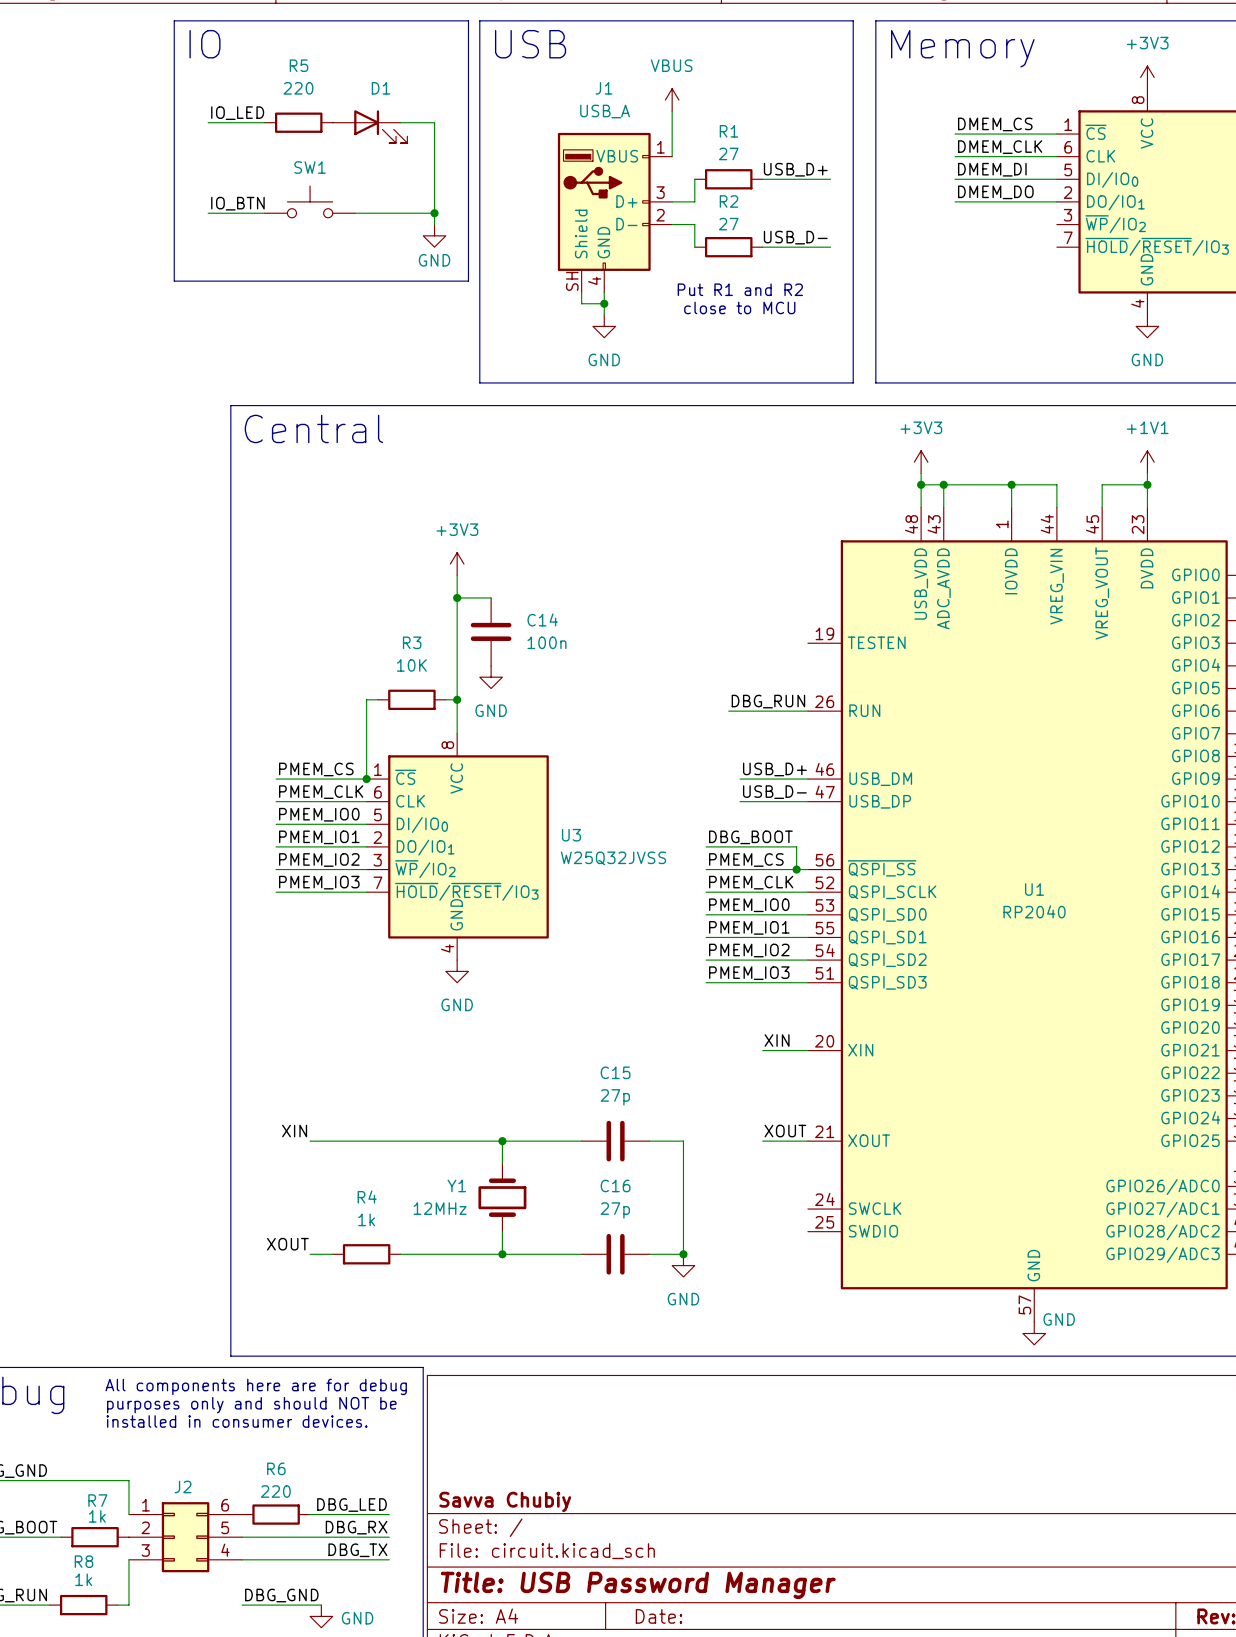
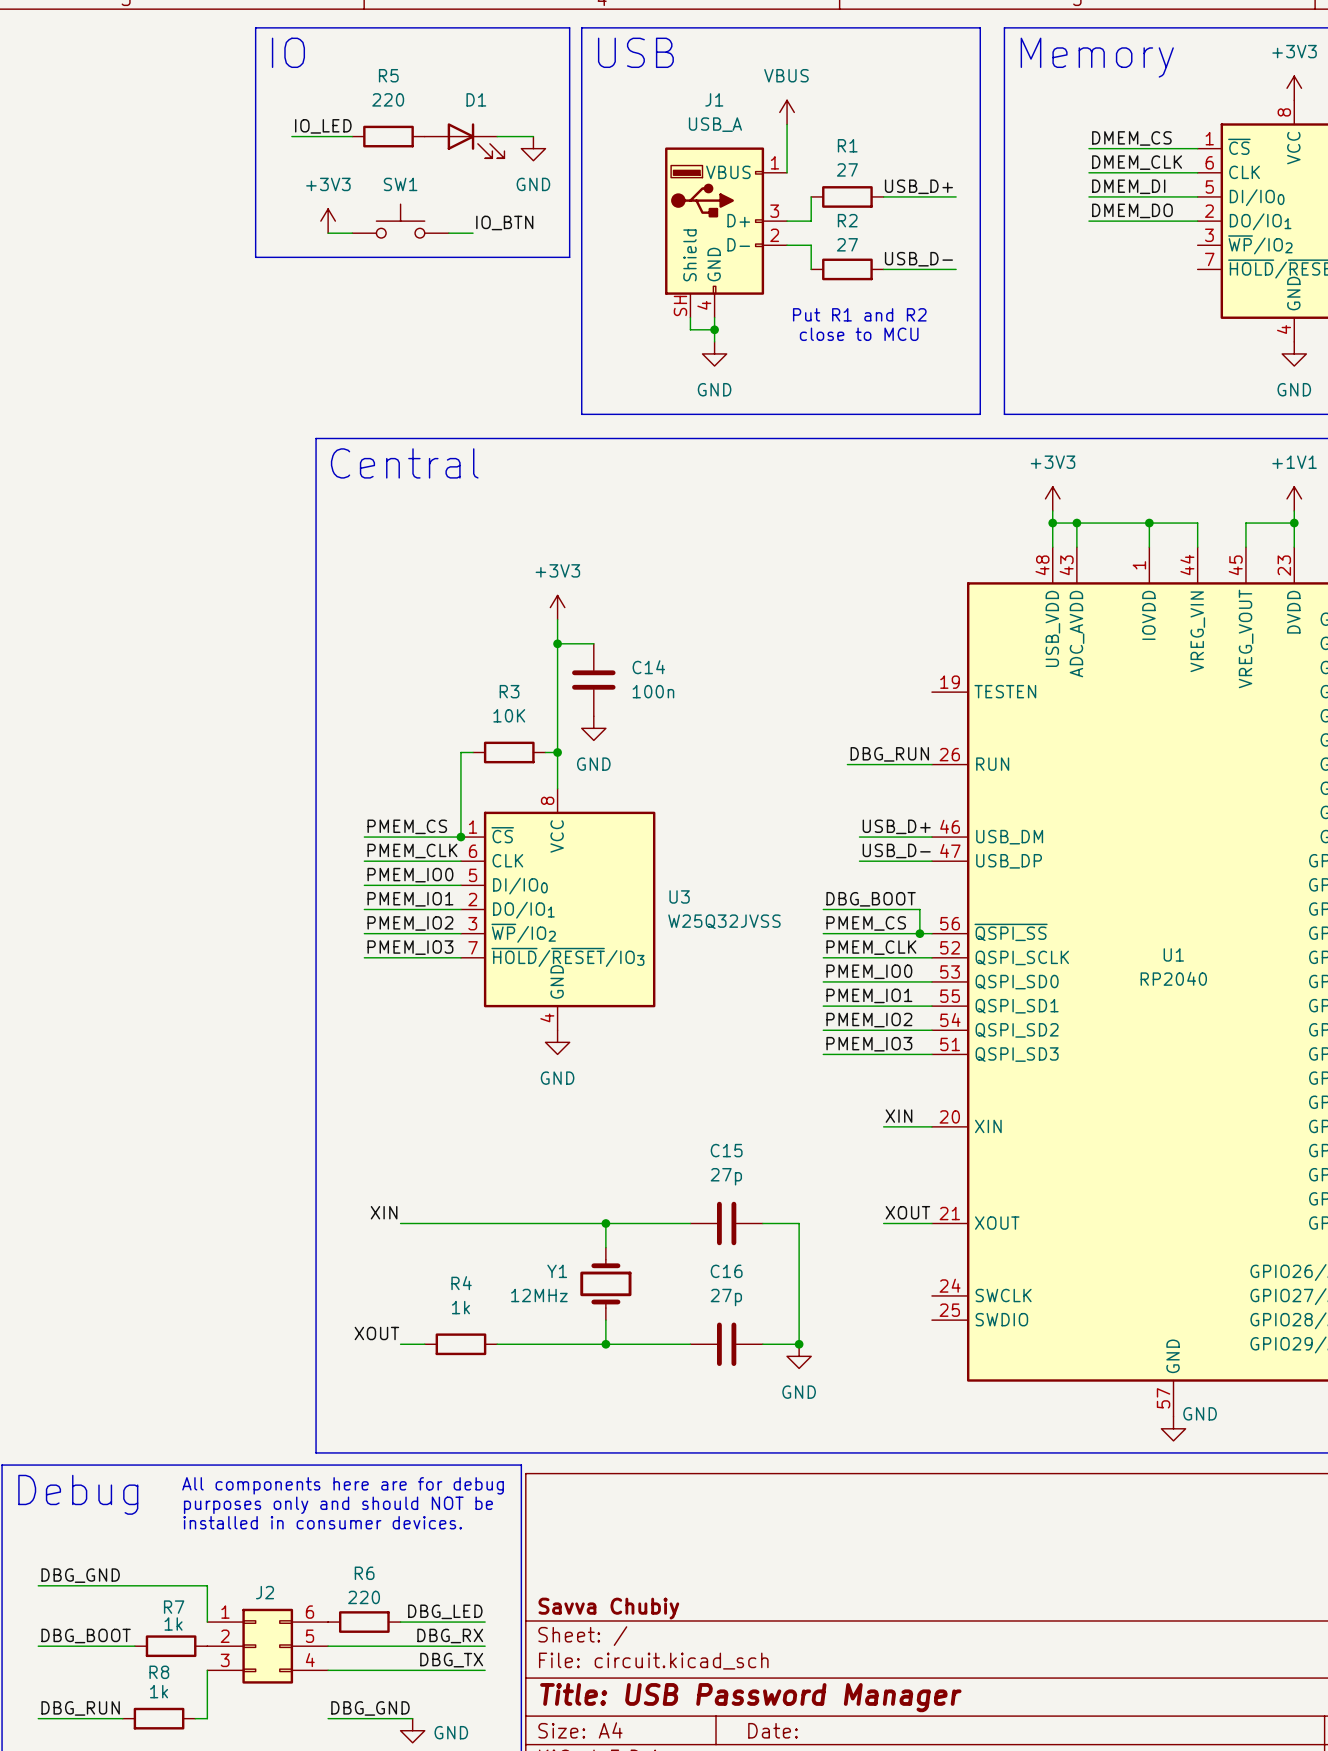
wire: (434, 122) (434, 224) -> none
power symbol: none -> +3V3 (328, 221)
label position: IO_BTN (237, 203) -> IO_BTN (504, 222)
wire: (208, 213) (242, 213) -> none
wire: (377, 213) (434, 213) -> none
junction: (434, 213) -> none
line: (174, 235) (174, 281) (468, 281) (468, 235) -> (255, 257) (569, 257)
power symbol position: GND (434, 235) -> GND (533, 148)
power symbol text position: GND (434, 260) -> GND (533, 184)

